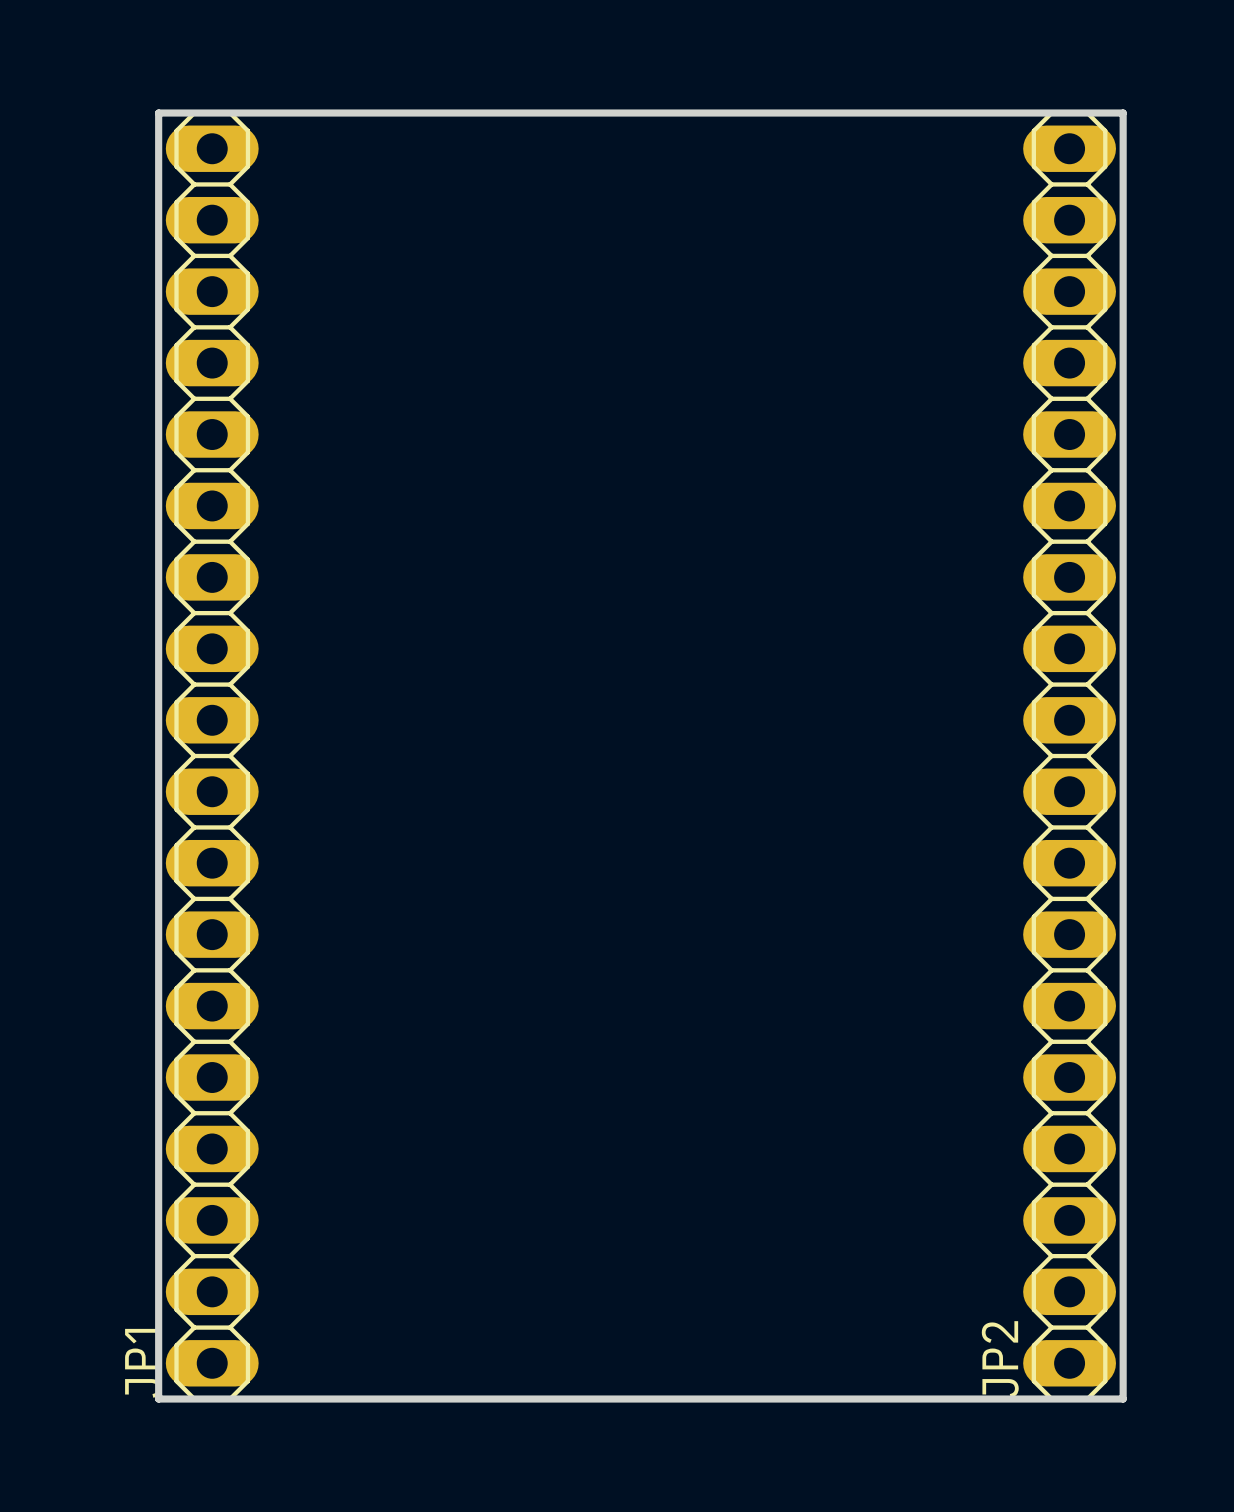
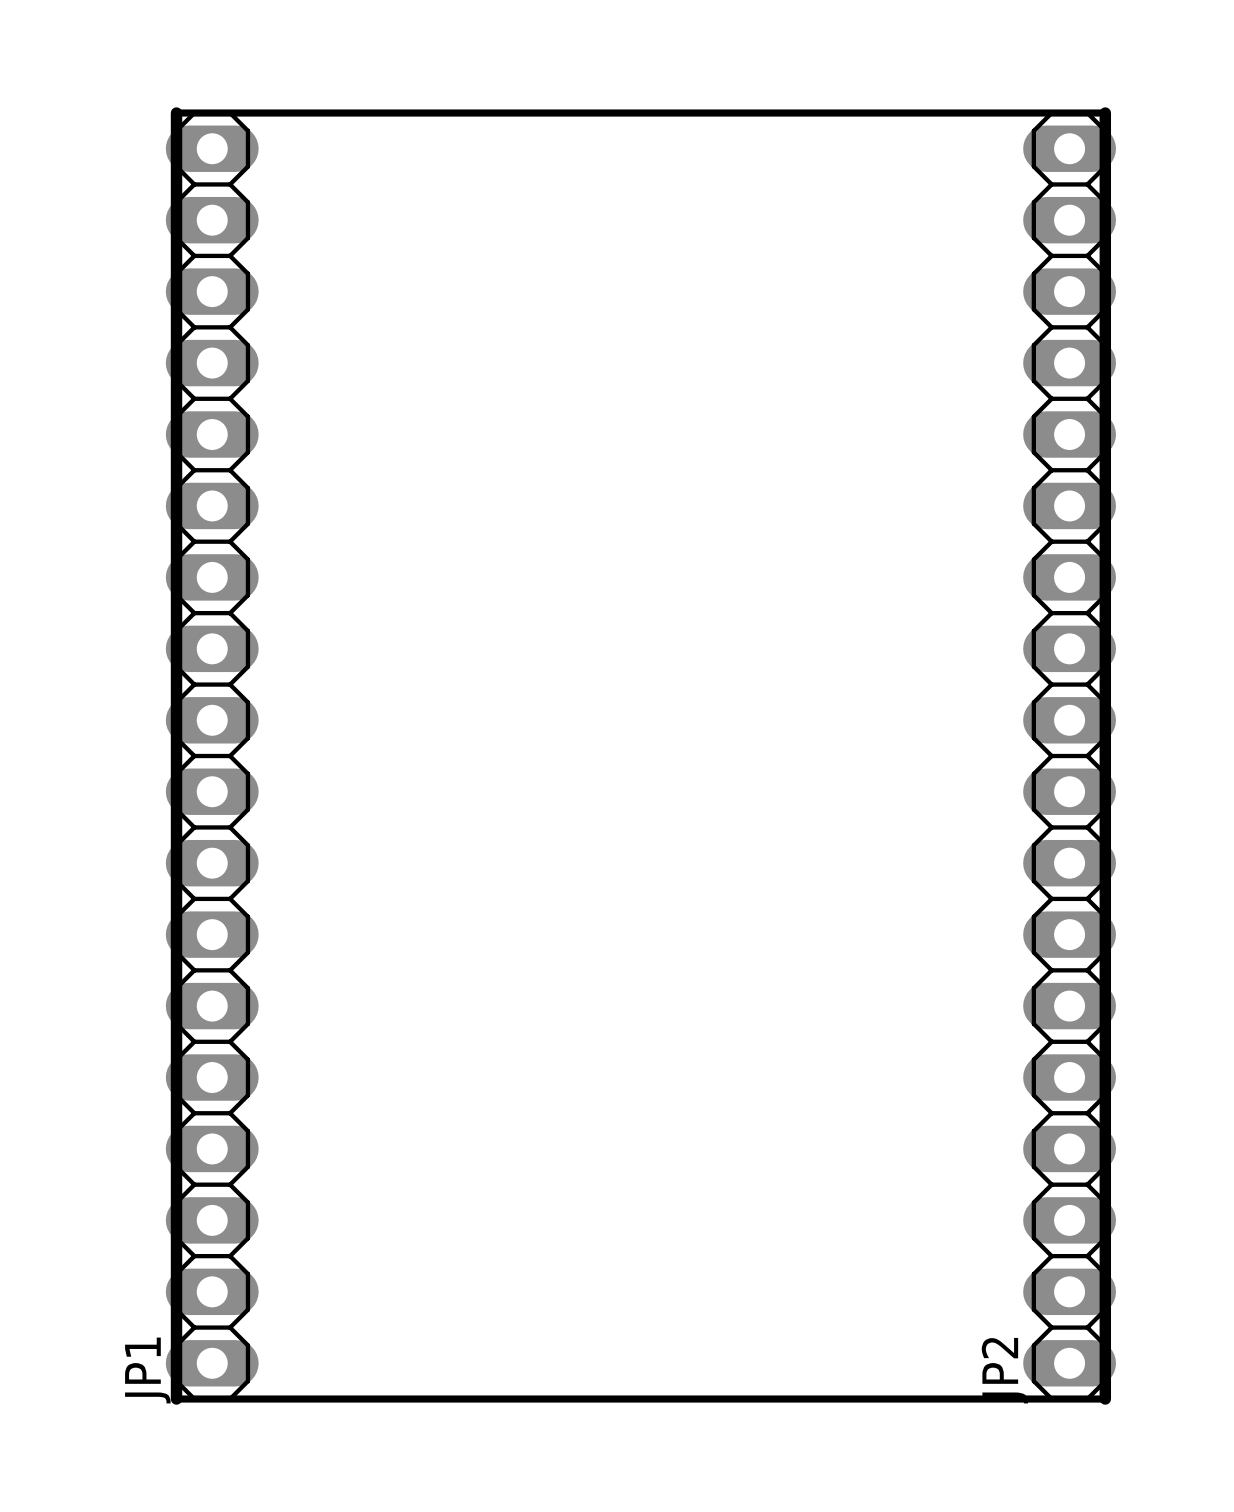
board edge: (176, 113) (158, 113) (158, 1399) (176, 1399) -> (176, 113) (176, 1399)
board edge: (1105, 113) (1123, 113) (1123, 1399) (1105, 1399) -> (1105, 113) (1105, 1399)

